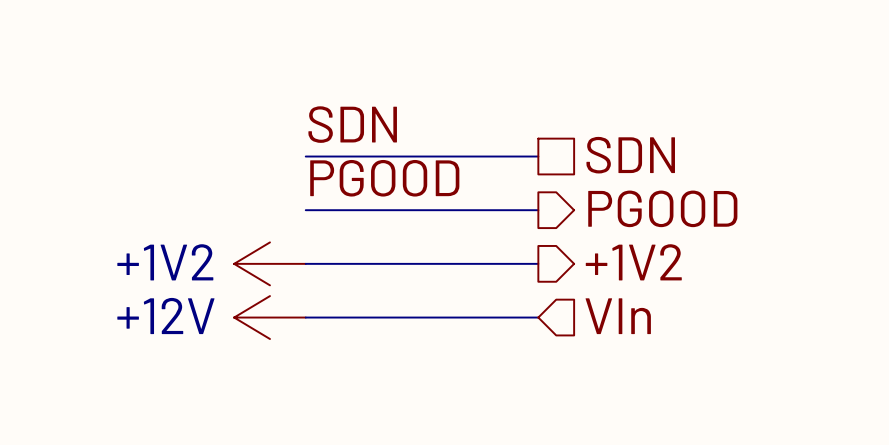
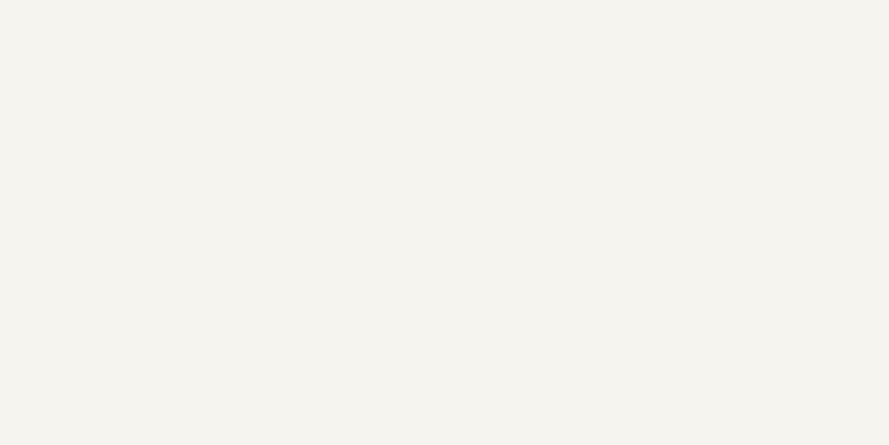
label: SDN (352, 124) -> none
hierarchical label: SDN (630, 155) -> none
wire: (305, 156) (538, 156) -> none
label: PGOOD (384, 178) -> none
hierarchical label: PGOOD (662, 208) -> none
wire: (305, 210) (538, 210) -> none
hierarchical label: +1V2 (633, 262) -> none
power symbol: +1V2 (269, 263) -> none
wire: (305, 263) (538, 263) -> none
hierarchical label: VIn (618, 316) -> none
power symbol: +12V (269, 317) -> none
wire: (305, 317) (538, 317) -> none

